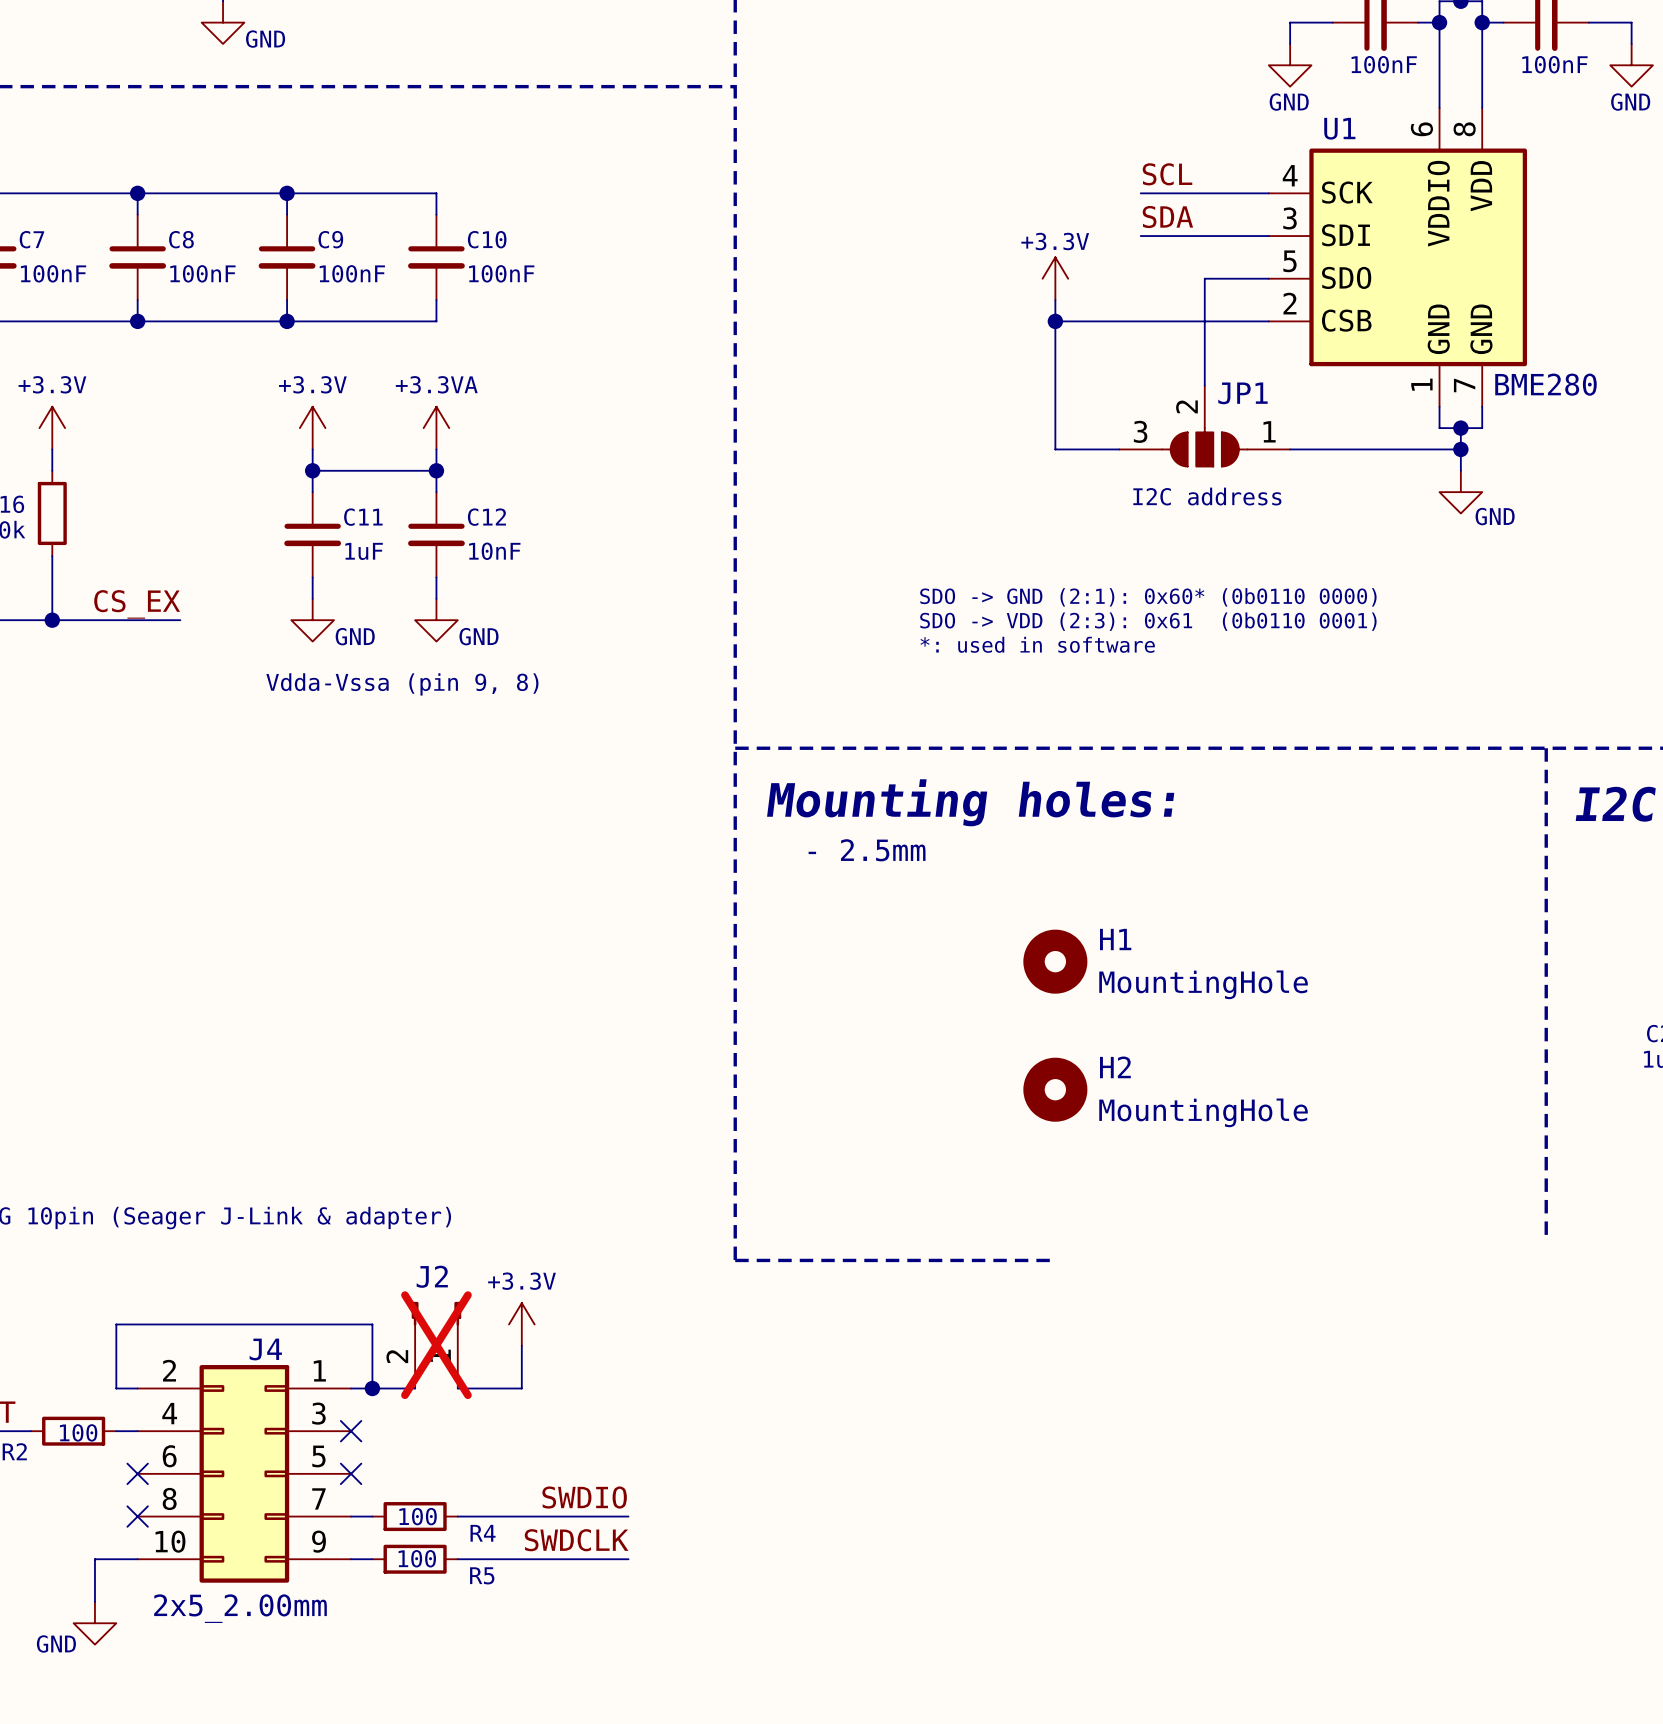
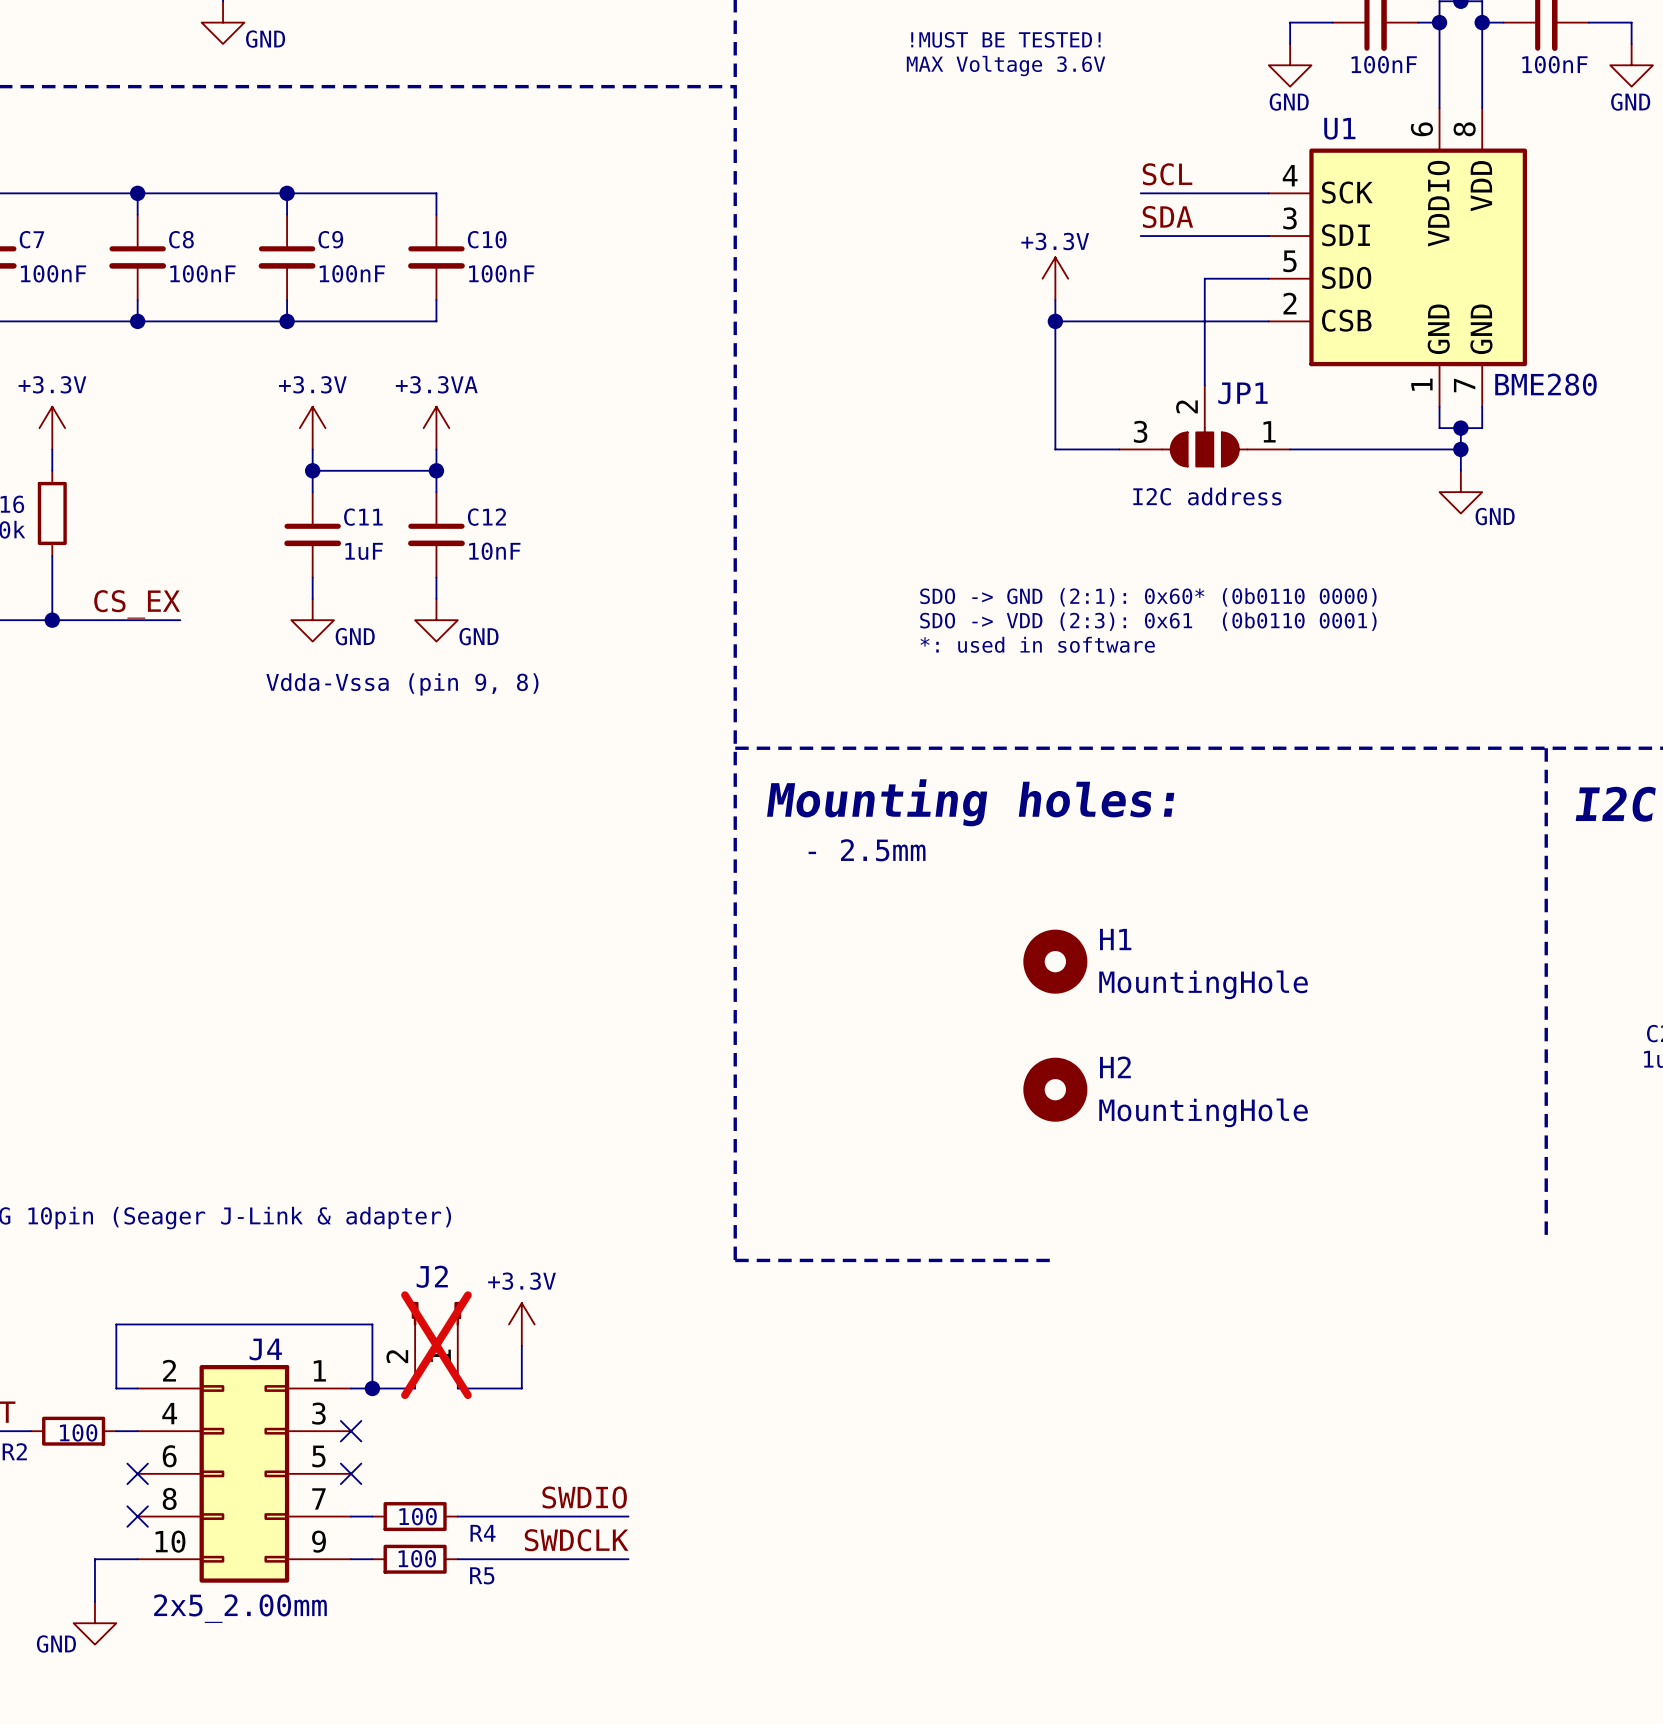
text: none -> !MUST BE TESTED! (1005, 39)
text: none -> MAX Voltage 3.6V (1006, 66)

